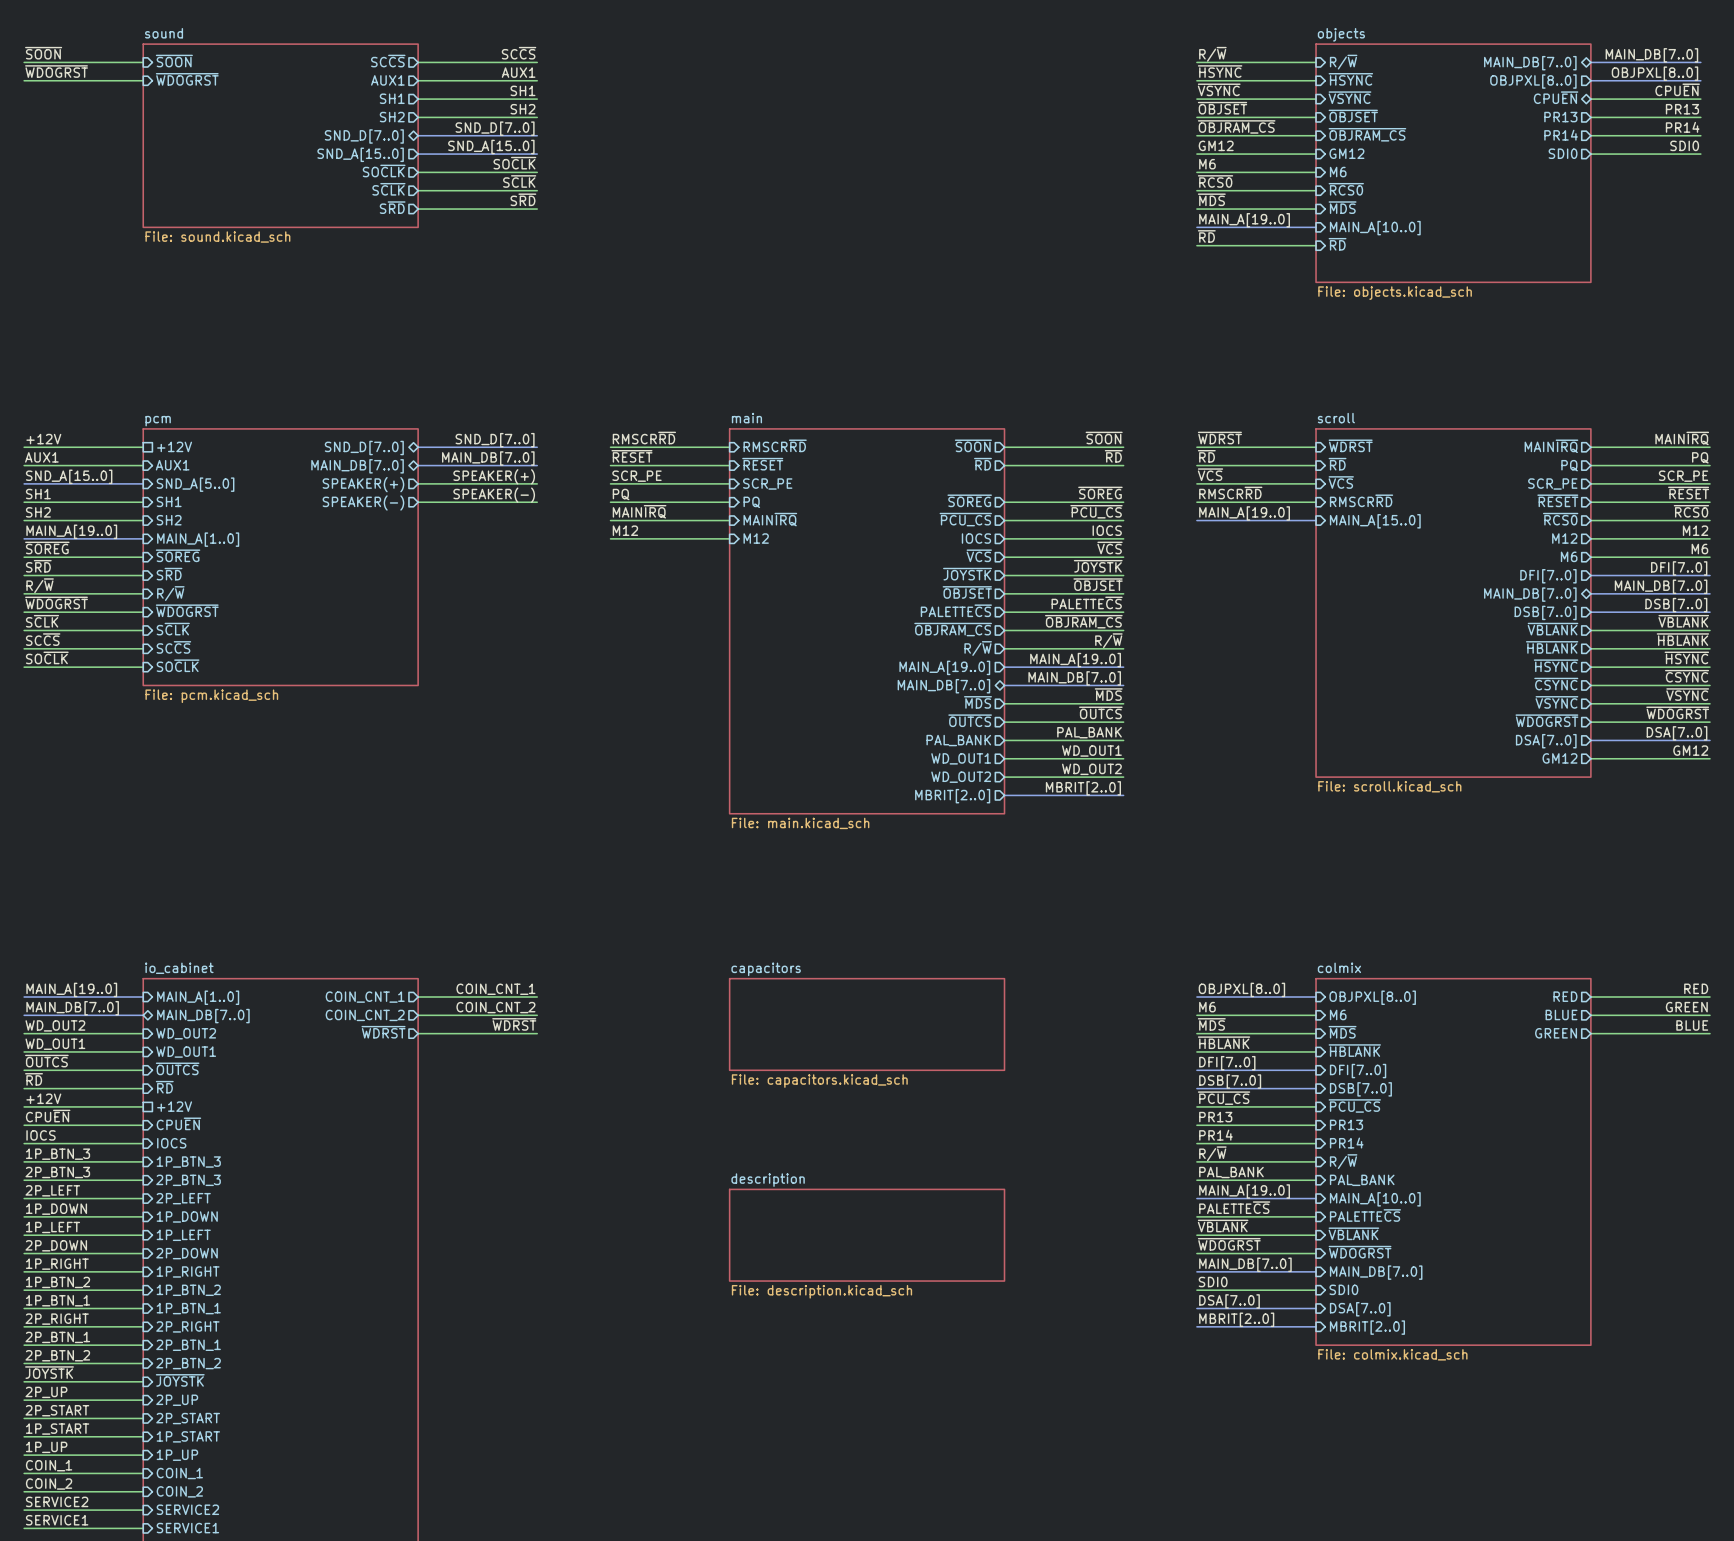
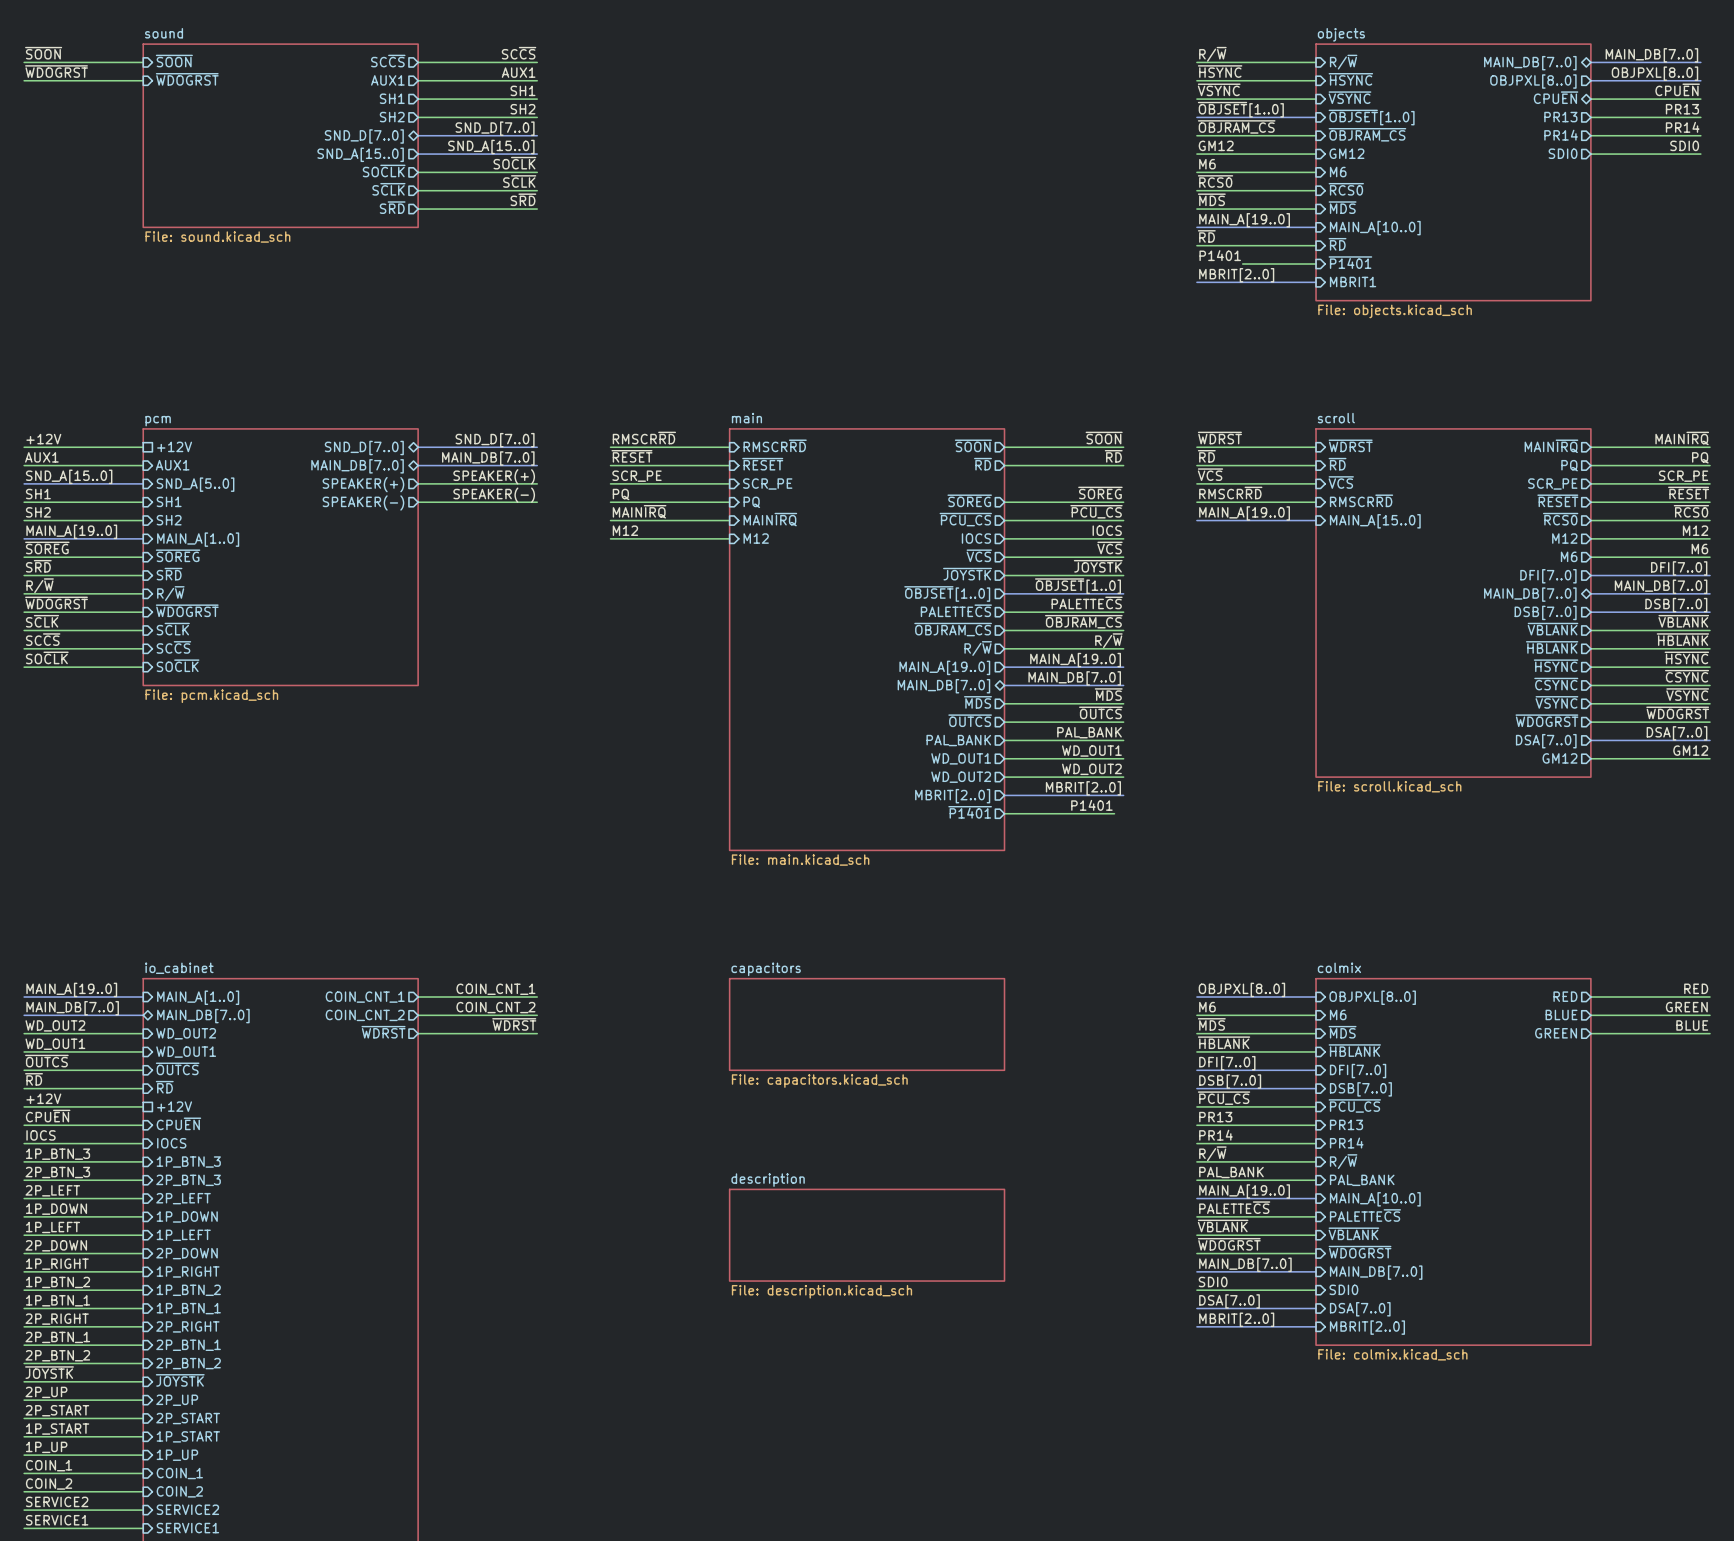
label: ~{OBJSET} (1222, 108) -> ~{OBJSET}[1..0] (1240, 109)
sheet pin: ~{OBJSET} (1353, 116) -> ~{OBJSET}[1..0] (1371, 117)
bus: none -> (1196, 117) (1316, 117)
sheet objects: File: objects.kicad_sch (1453, 163) -> none
sheet objects: none -> File: objects.kicad_sch (1453, 172)
label: none -> P1401 (1220, 255)
sheet pin: none -> ~{P1401} (1350, 262)
wire: none -> (1242, 264) (1316, 264)
label: none -> MBRIT[2..0] (1236, 275)
sheet pin: none -> MBRIT1 (1353, 281)
bus: none -> (1196, 282) (1316, 282)
label: ~{OBJSET} (1098, 584) -> ~{OBJSET}[1..0] (1077, 586)
sheet pin: ~{OBJSET} (967, 592) -> ~{OBJSET}[1..0] (947, 593)
bus: none -> (1004, 593) (1123, 593)
sheet main: File: main.kicad_sch (867, 621) -> none
sheet main: none -> File: main.kicad_sch (867, 639)
label: none -> P1401 (1091, 805)
sheet pin: none -> ~{P1401} (970, 812)
wire: none -> (1004, 813) (1114, 813)

